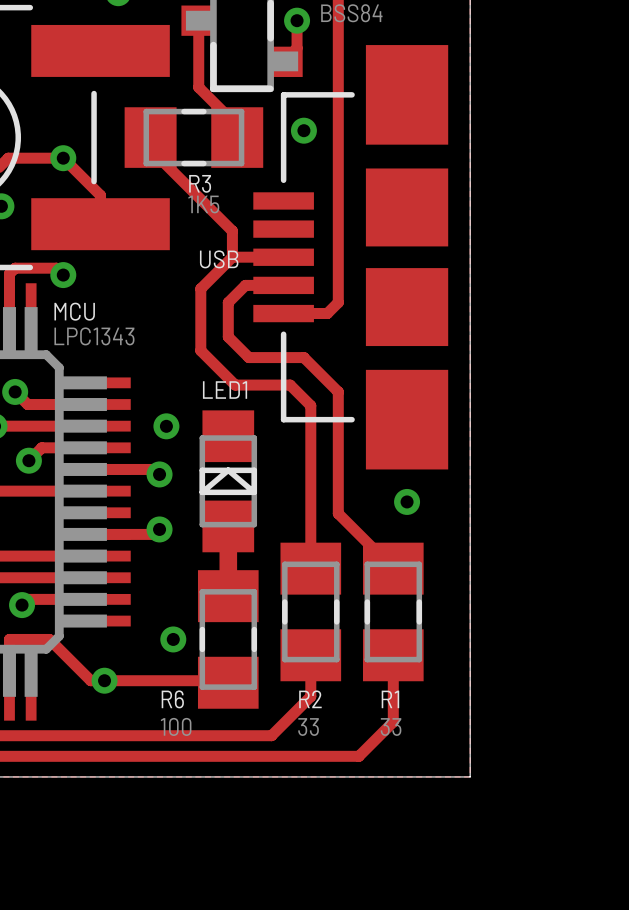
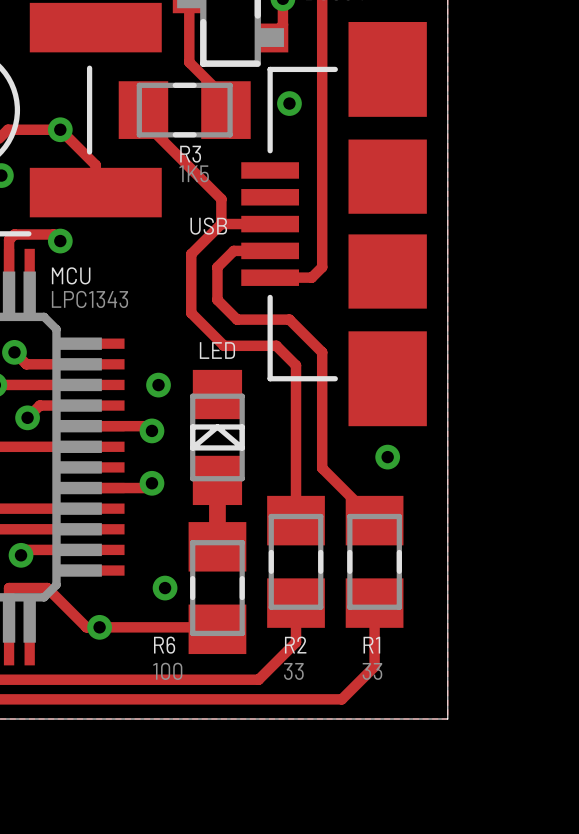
LED1 name: LED1 (225, 390) -> LED (217, 350)

